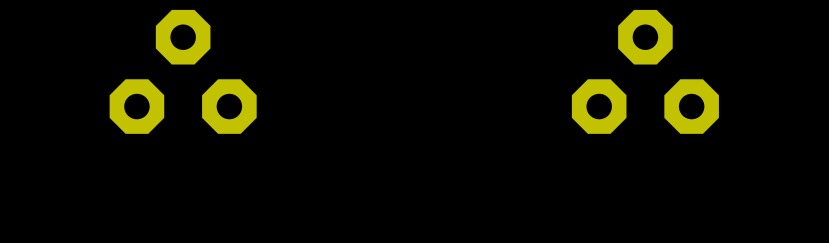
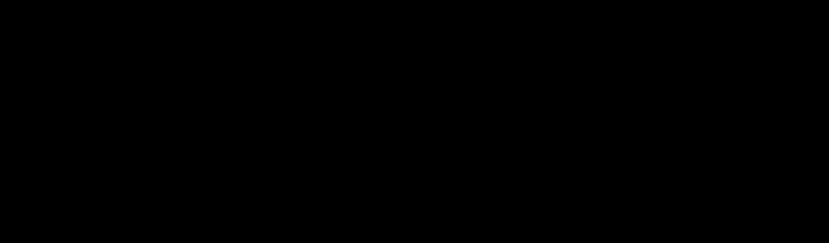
part: (183, 71) -> none
part: (645, 71) -> none

